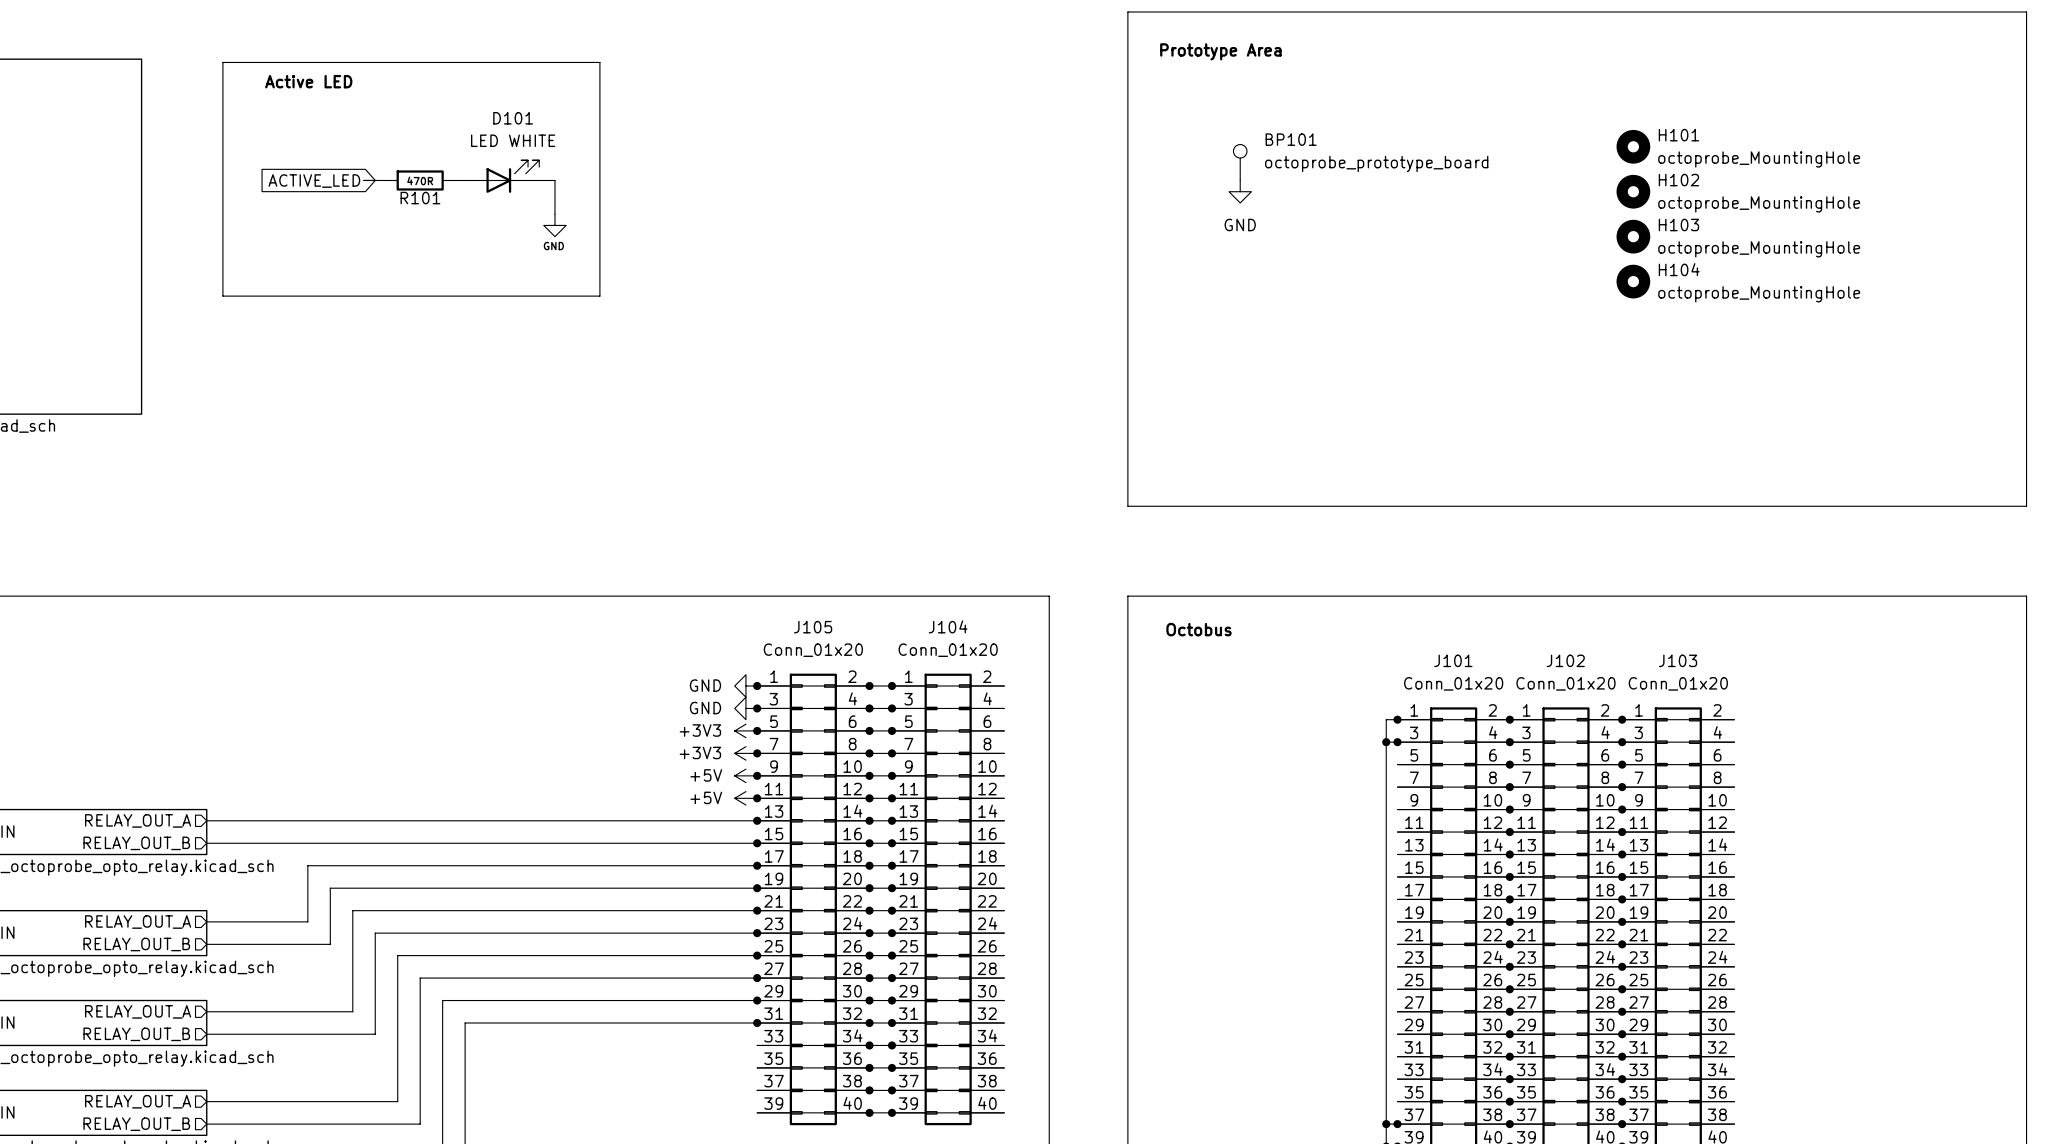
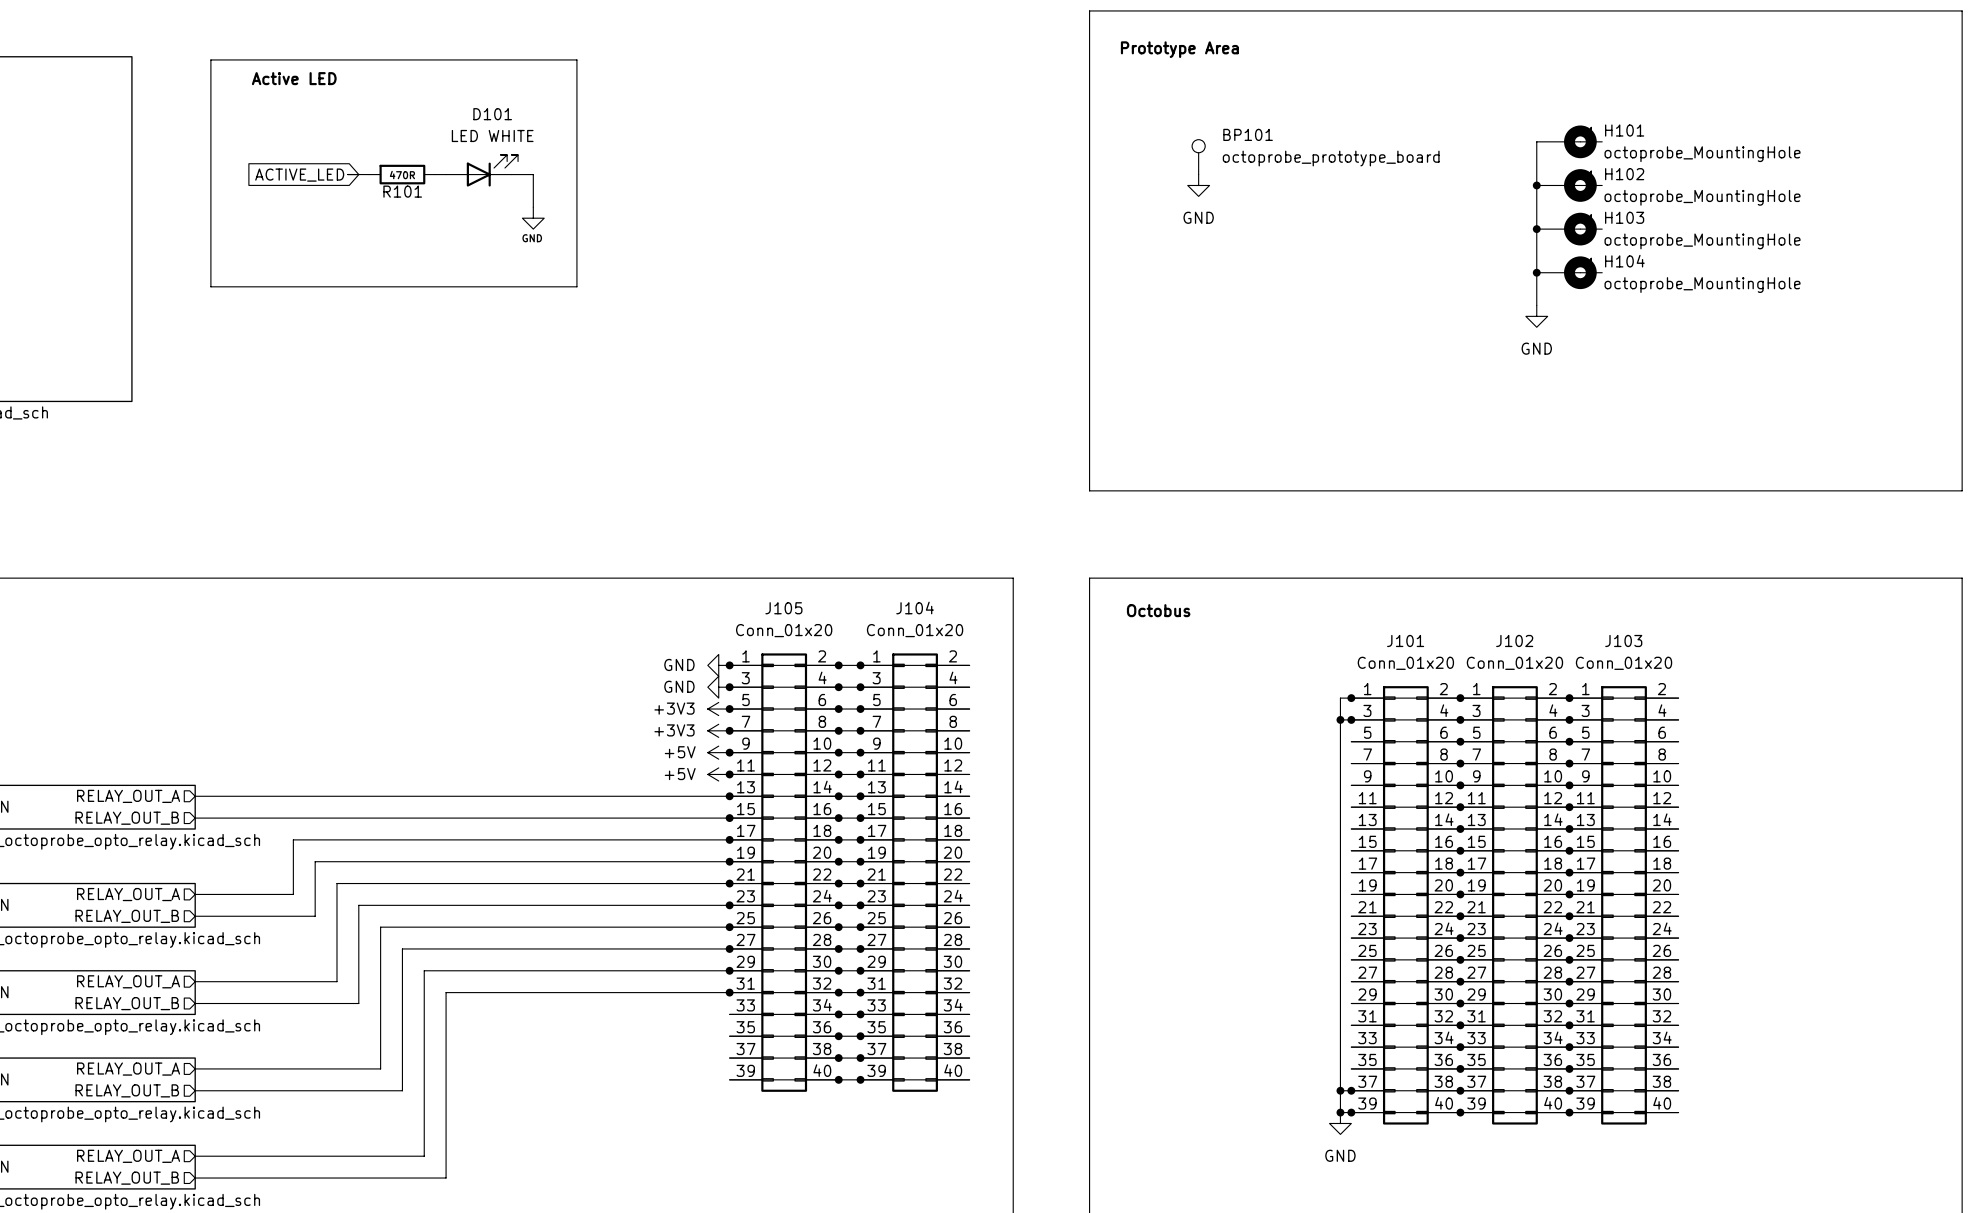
H101 symbol: [1616, 129, 1651, 164] -> [1564, 125, 1603, 159]
wire: none -> (1580, 141) (1536, 141) (1536, 305)
H102 symbol: [1616, 174, 1651, 209] -> [1564, 169, 1603, 202]
wire: none -> (1536, 185) (1580, 185)
junction: none -> (1536, 185)
H103 symbol: [1616, 219, 1651, 254] -> [1564, 212, 1603, 246]
wire: none -> (1536, 229) (1580, 229)
junction: none -> (1536, 229)
H104 symbol: [1616, 264, 1651, 299] -> [1564, 256, 1603, 290]
wire: none -> (1536, 272) (1580, 272)
junction: none -> (1536, 272)
power symbol: none -> GND (1536, 316)

